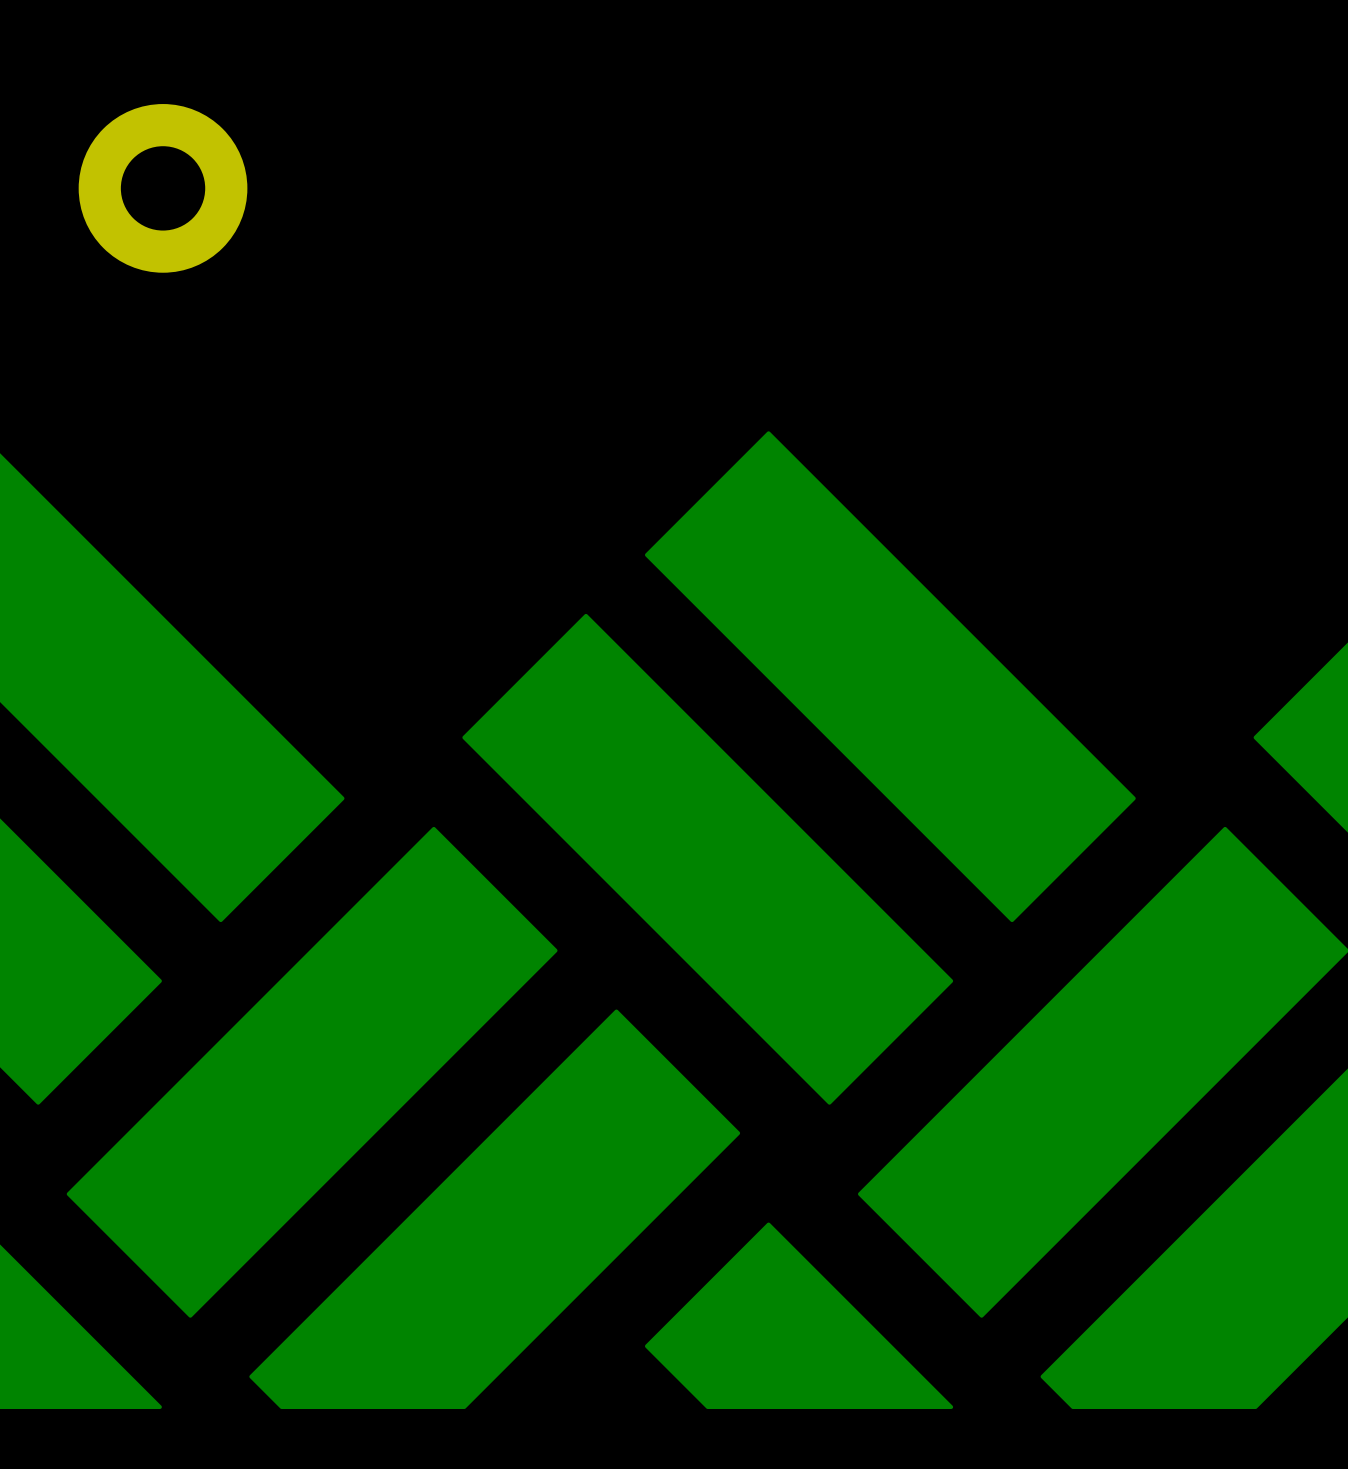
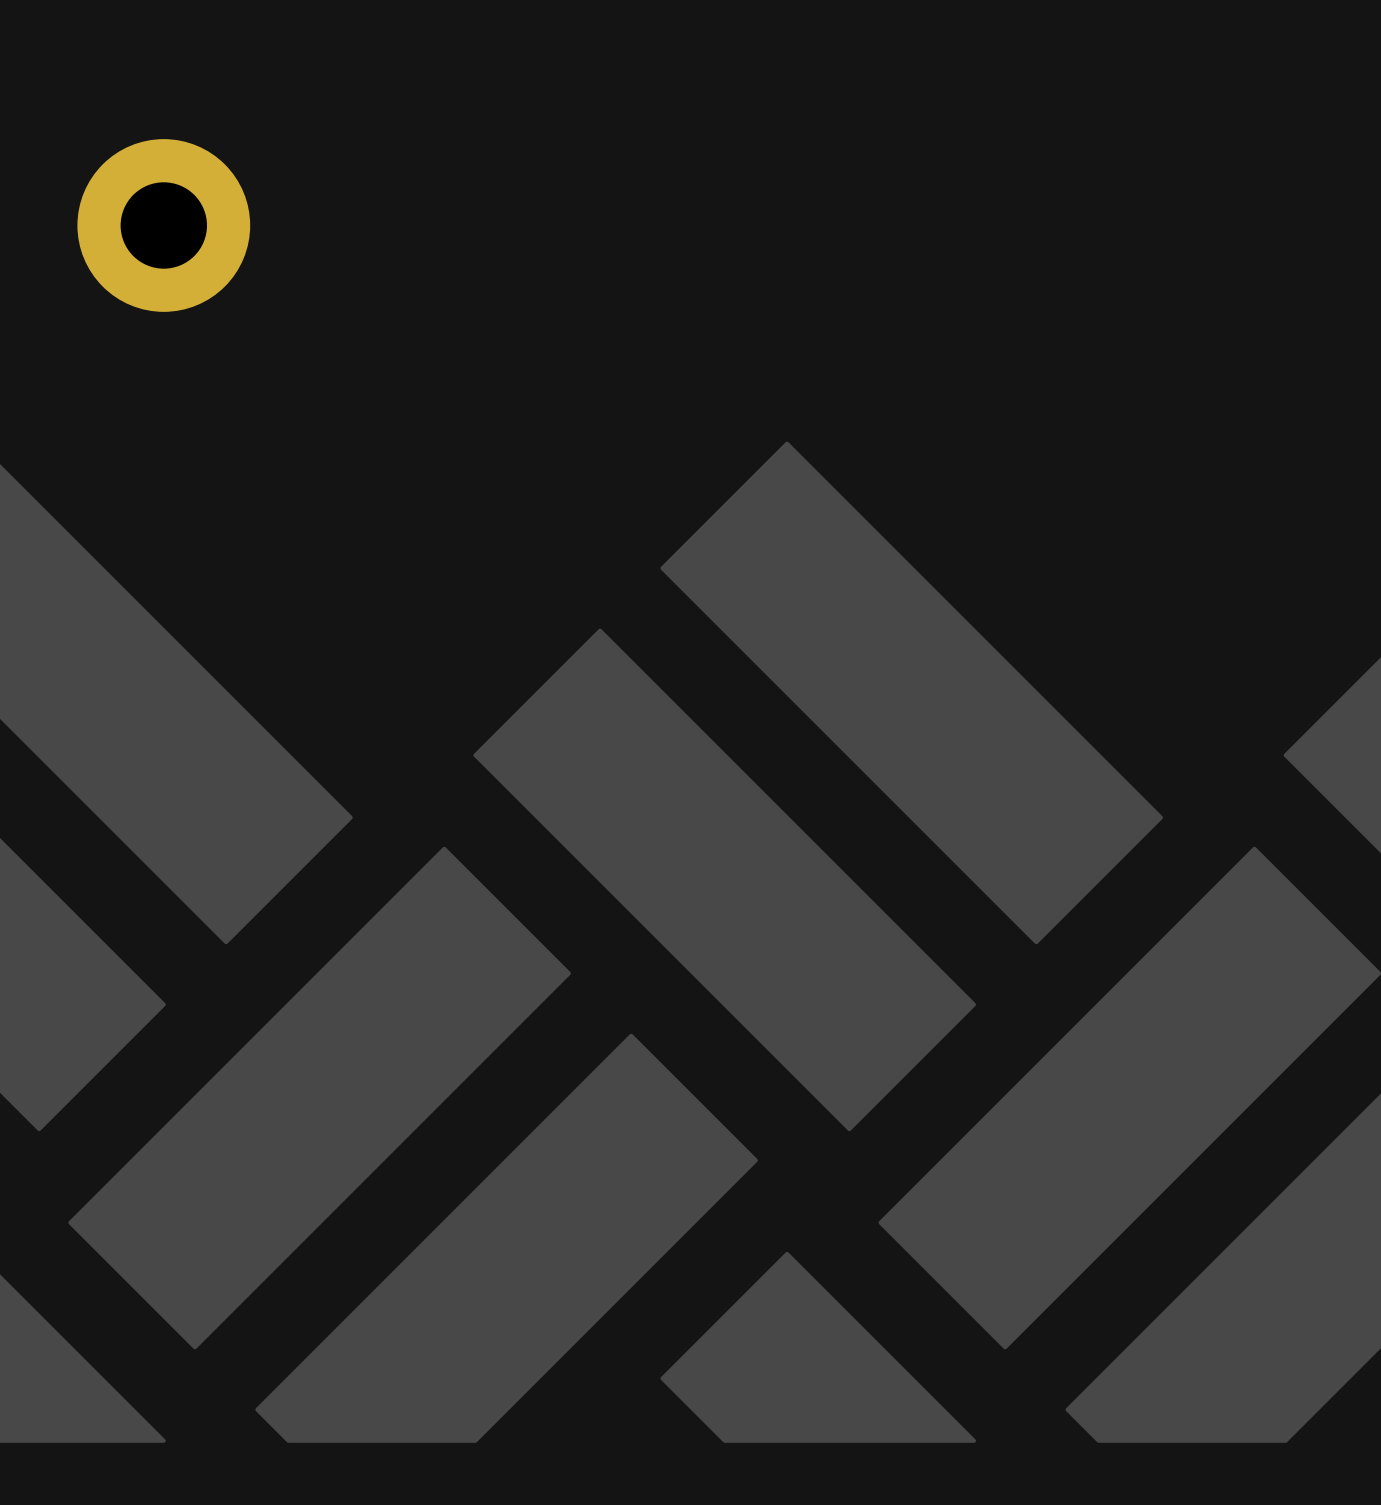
part position: (163, 188) -> (163, 225)

